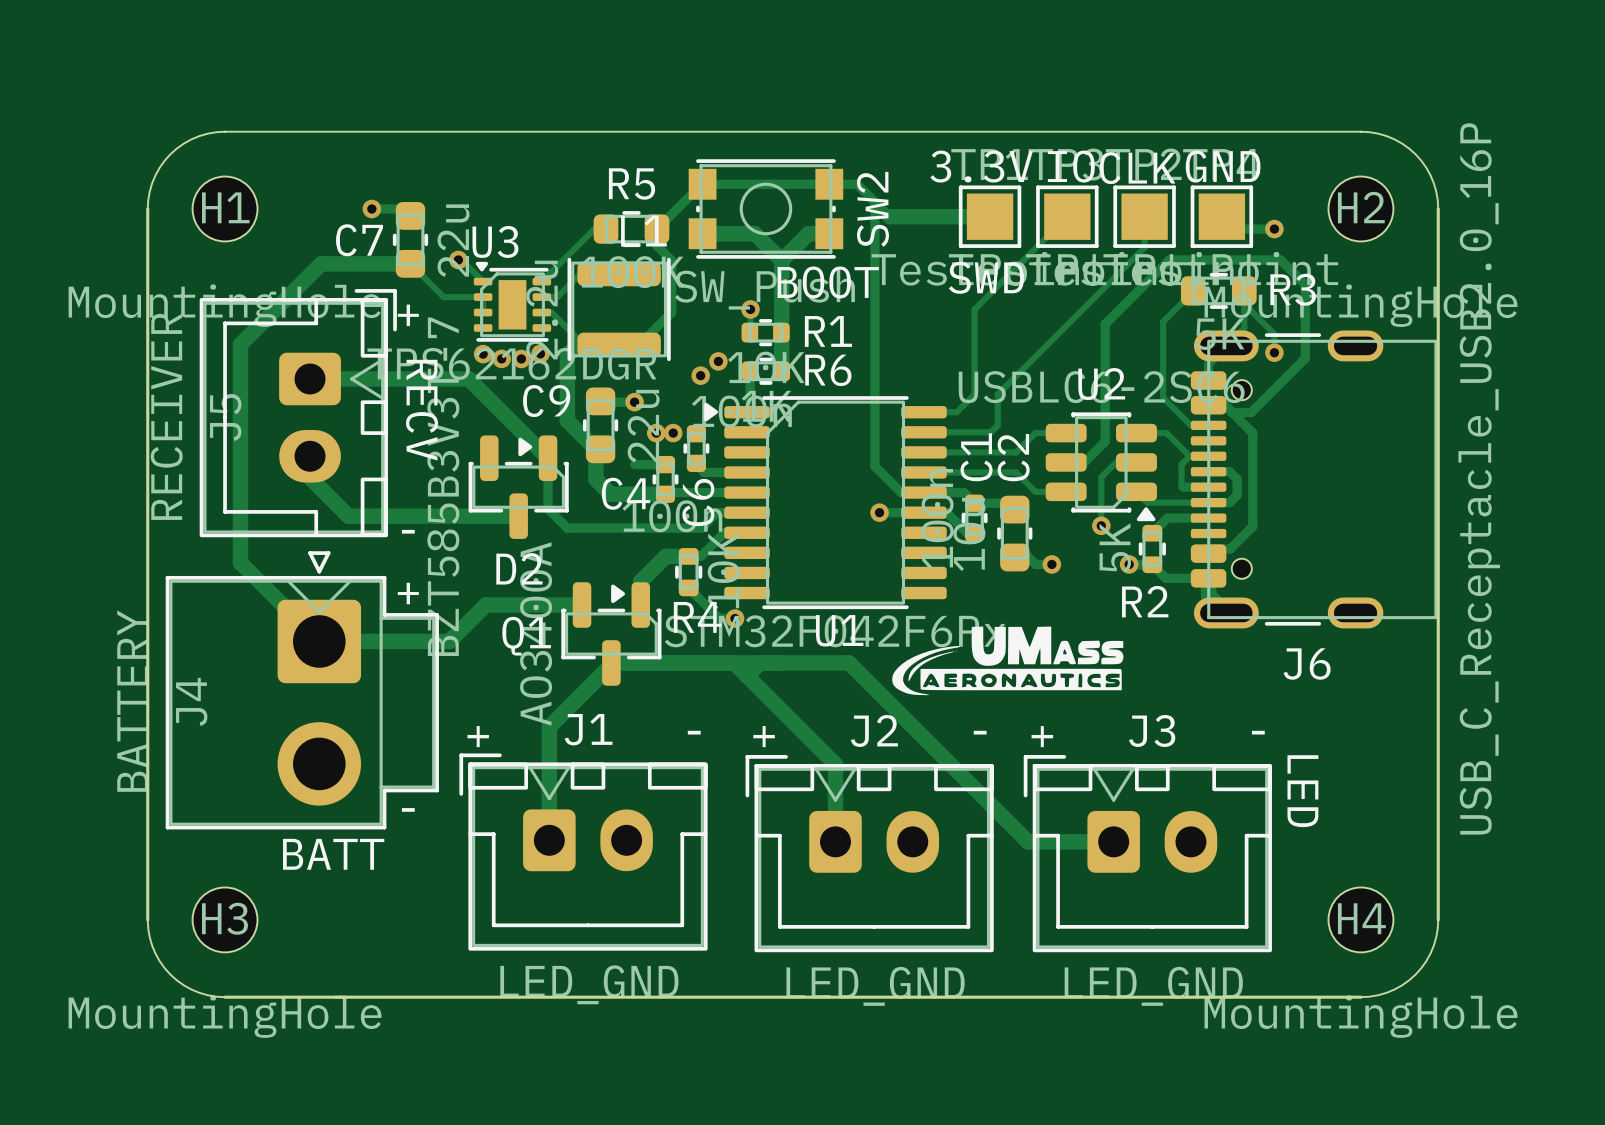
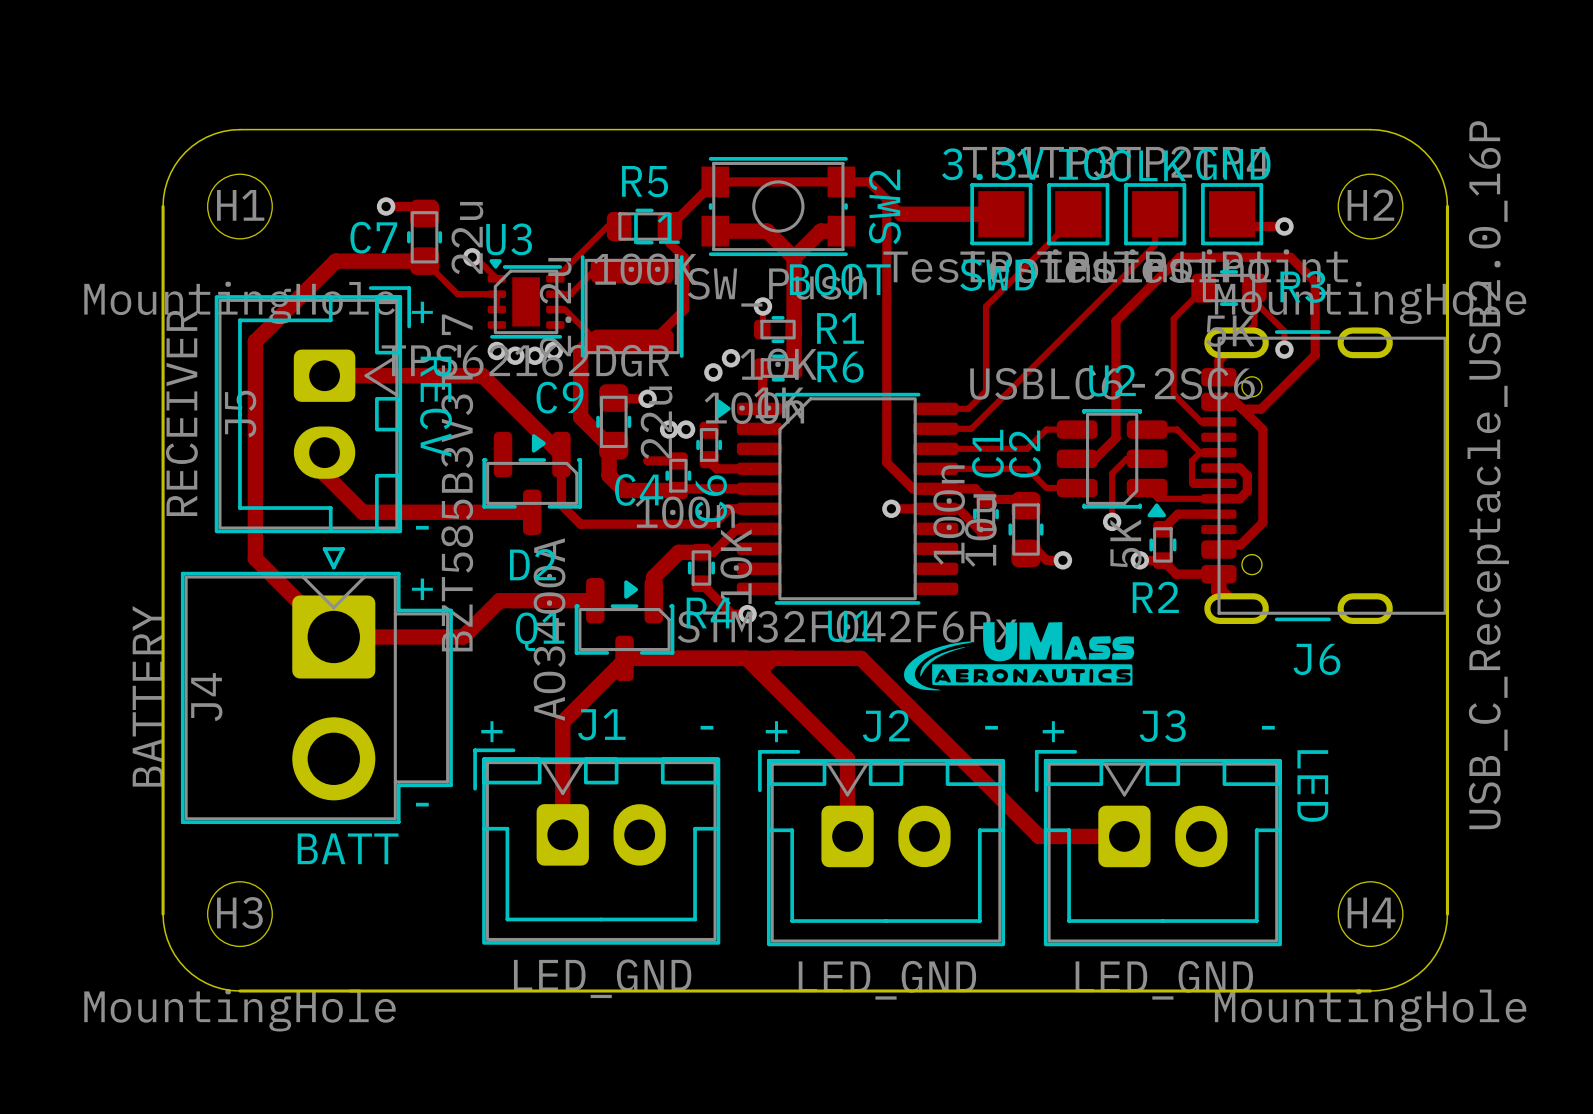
track: (997, 394) (997, 425) (990, 432) (959, 432) -> (1009, 391) (971, 428)

